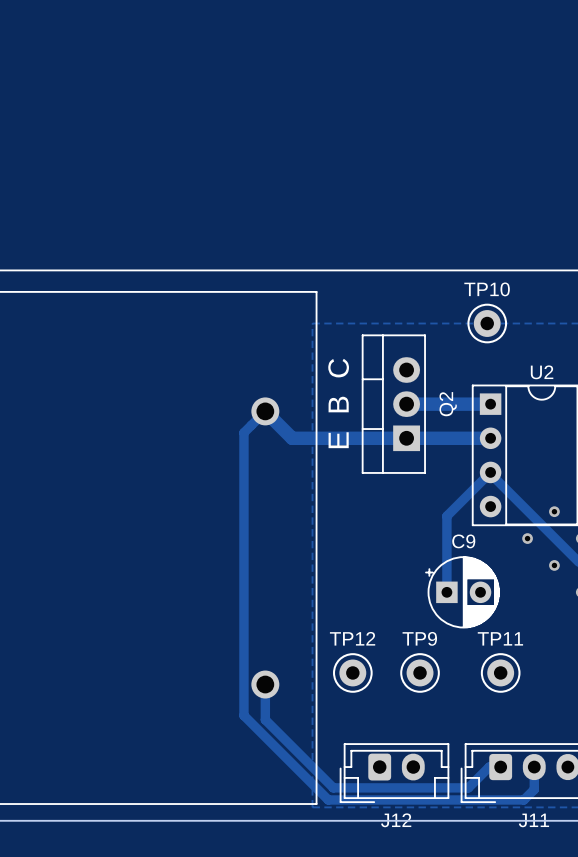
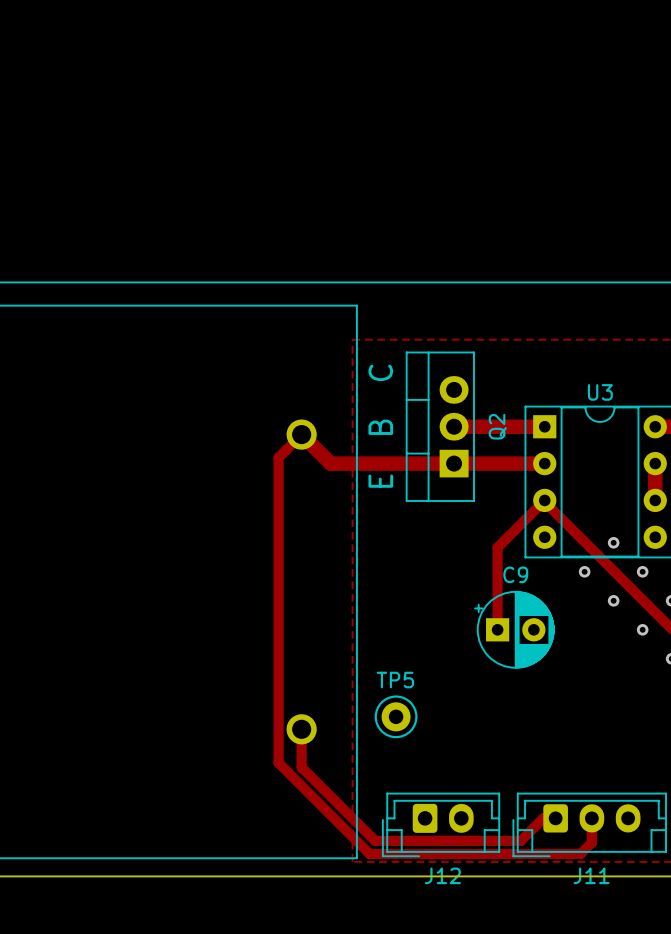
TP10: (487, 323) -> none
U2 name: U2 (542, 372) -> U3 (600, 392)
TP12 name: TP12 (352, 638) -> TP5 (395, 680)
TP9: (420, 672) -> none
TP11: (500, 672) -> none

